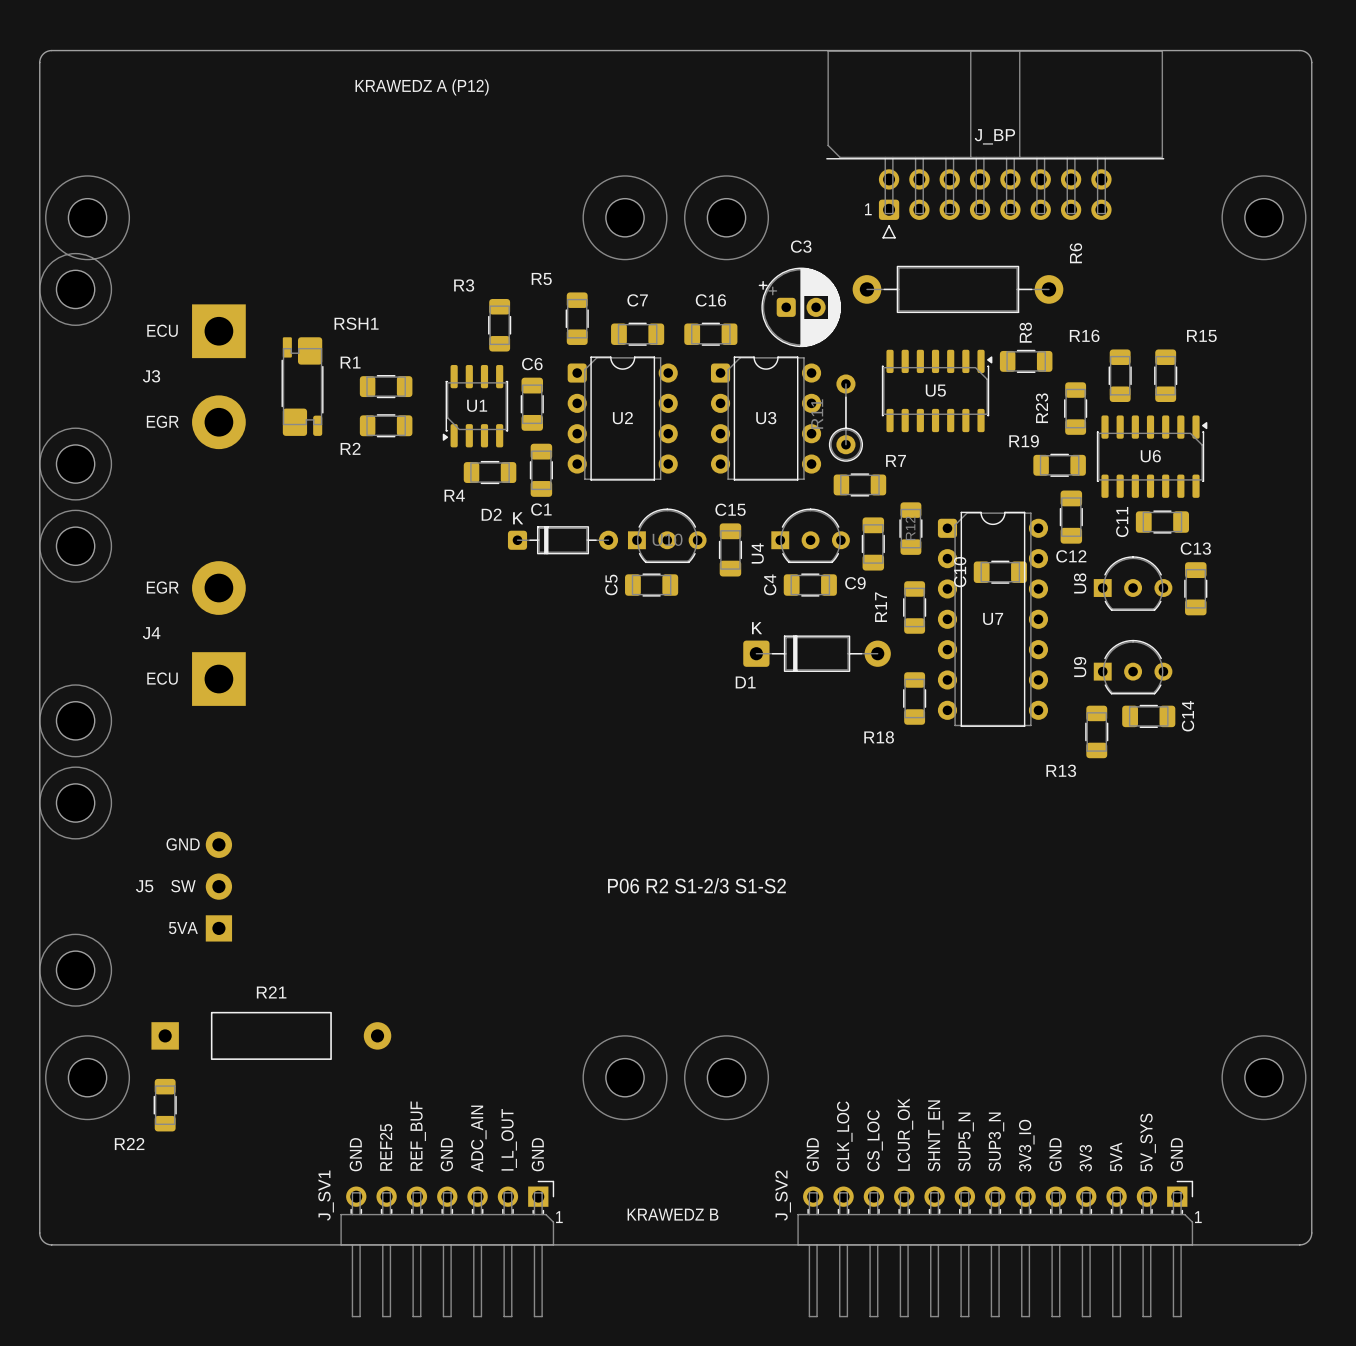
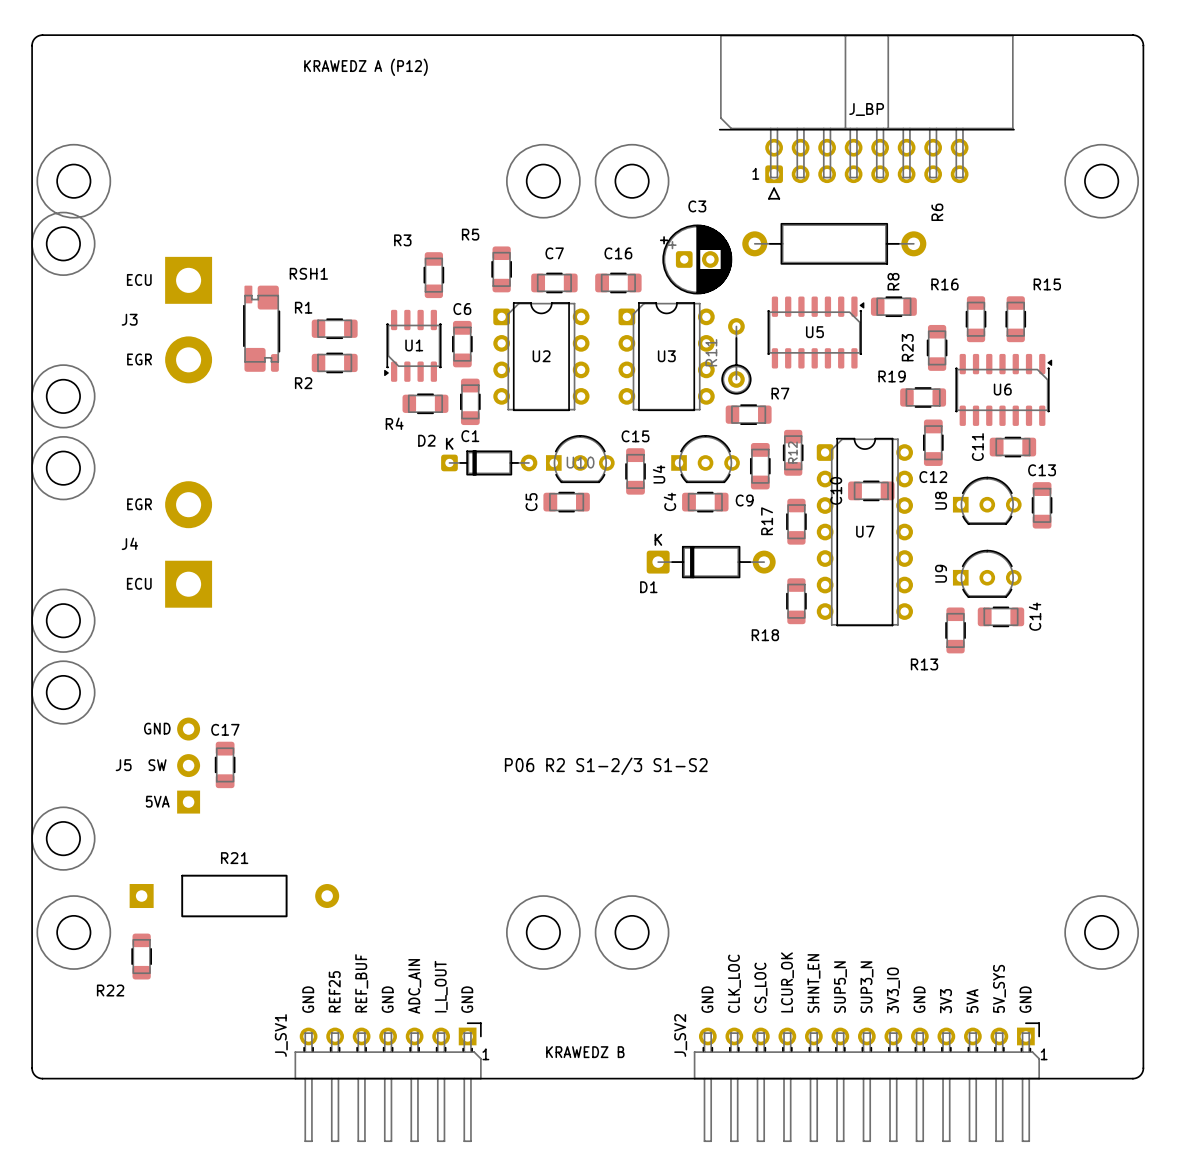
C17: none -> (225, 764)

